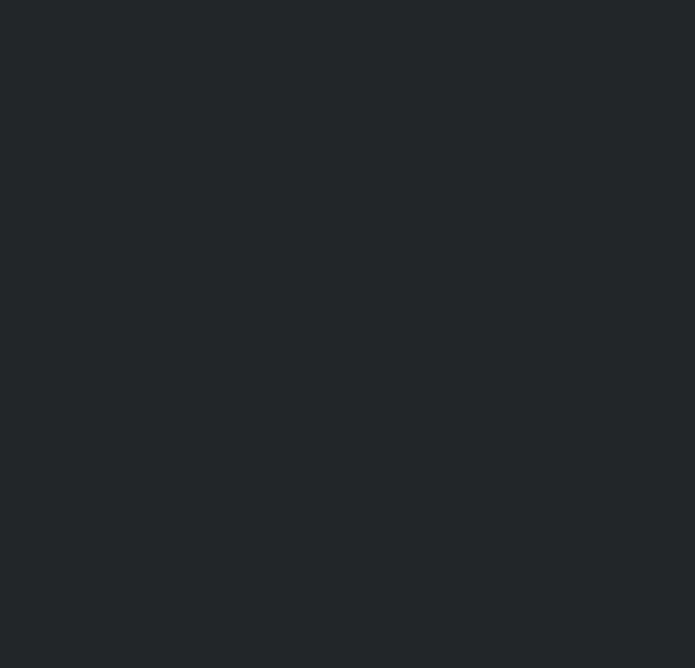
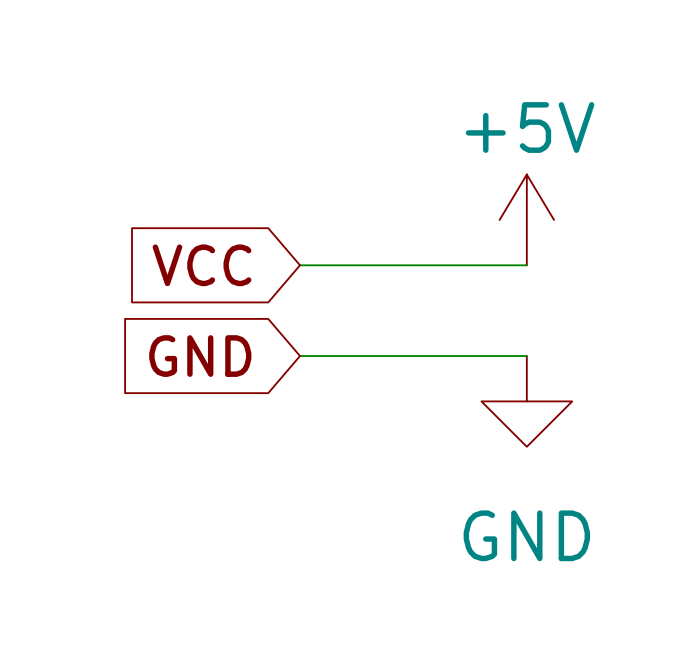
power symbol: none -> +5V (526, 219)
global label: none -> VCC (202, 265)
wire: none -> (300, 265) (526, 265)
global label: none -> GND (200, 356)
wire: none -> (300, 356) (526, 356)
power symbol: none -> GND (526, 401)

